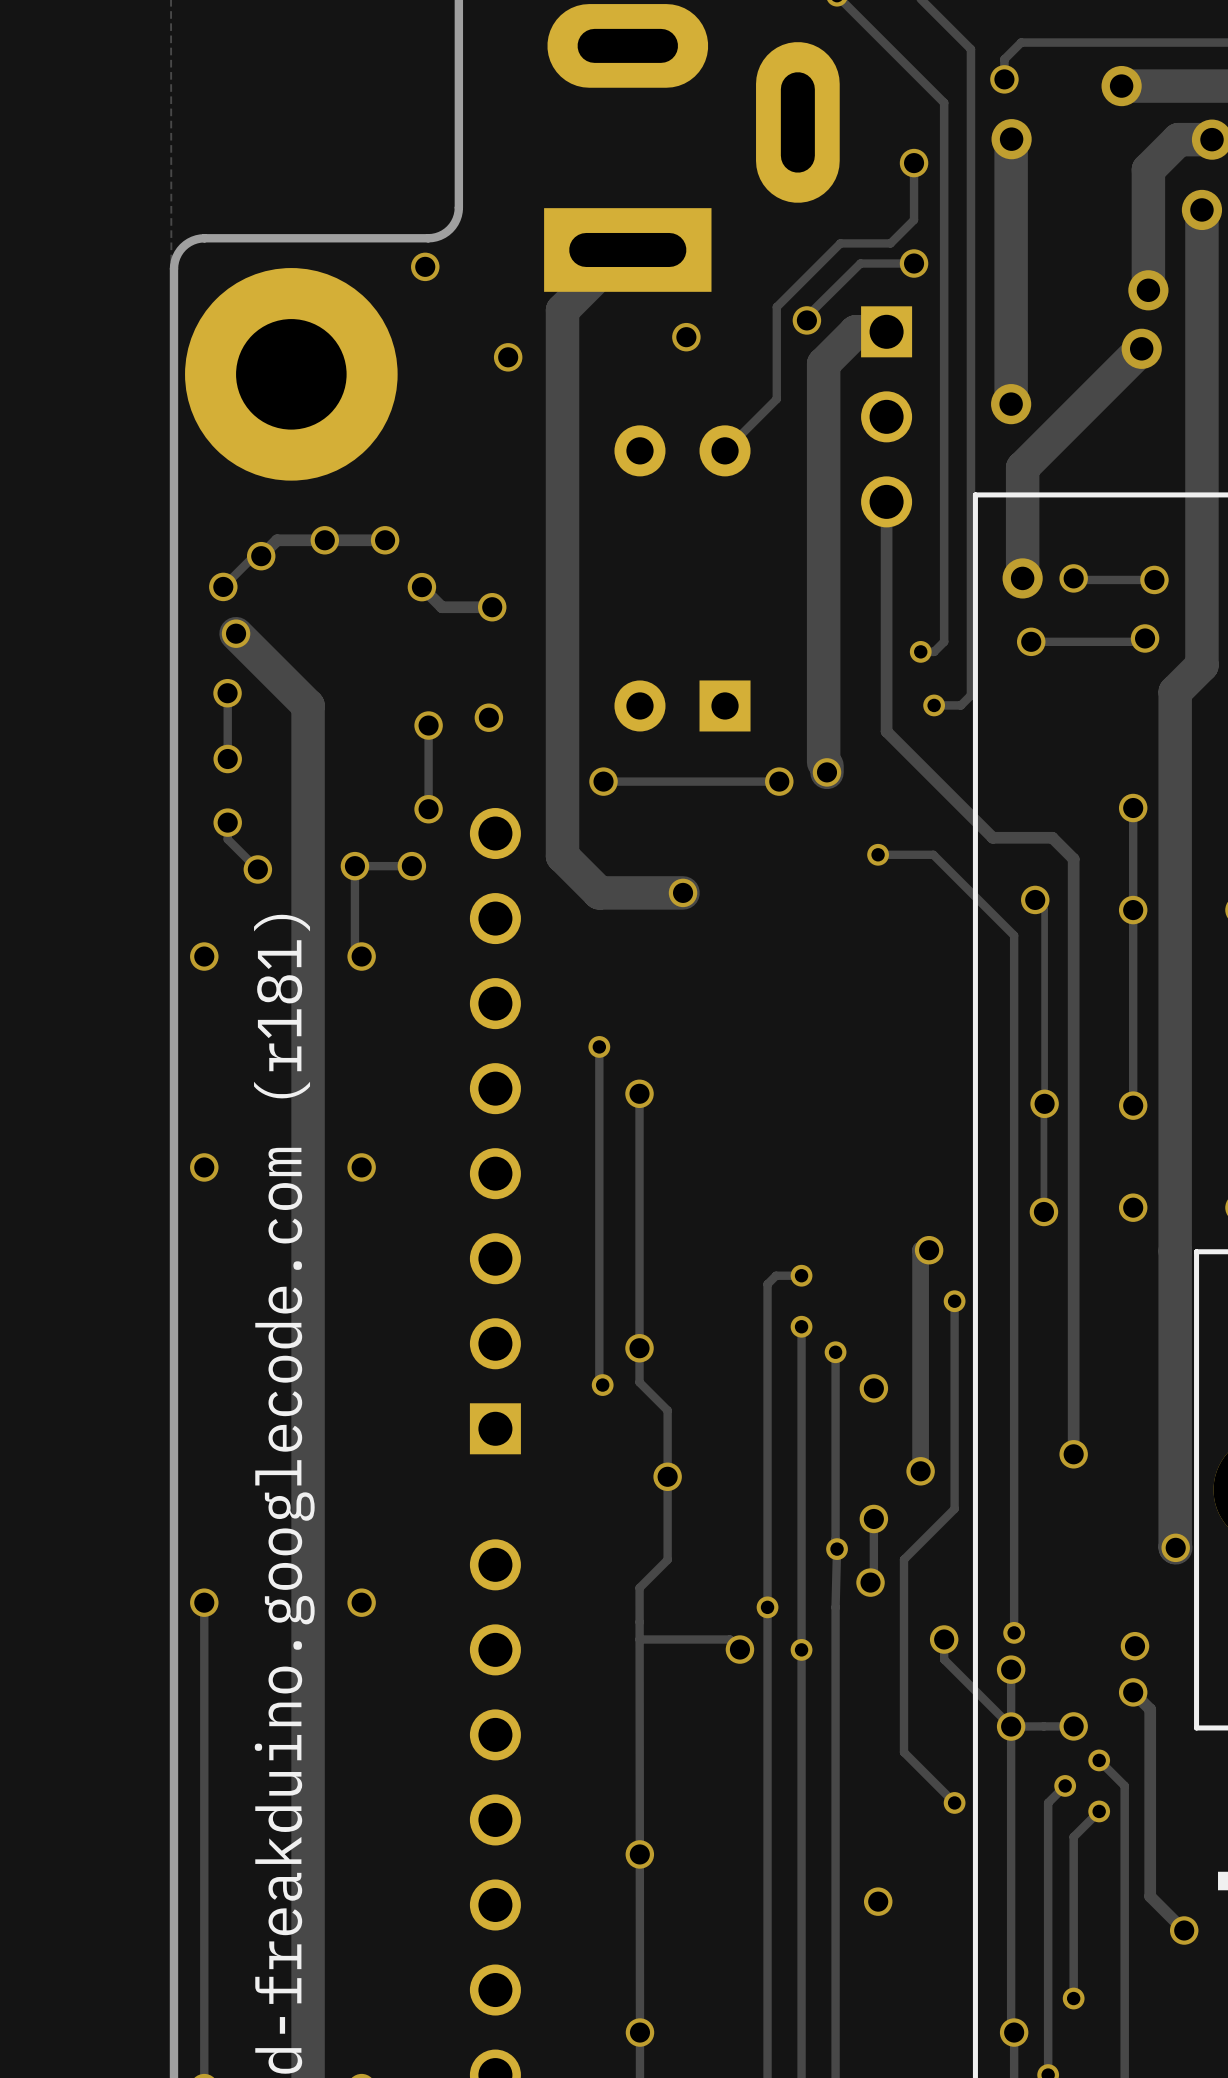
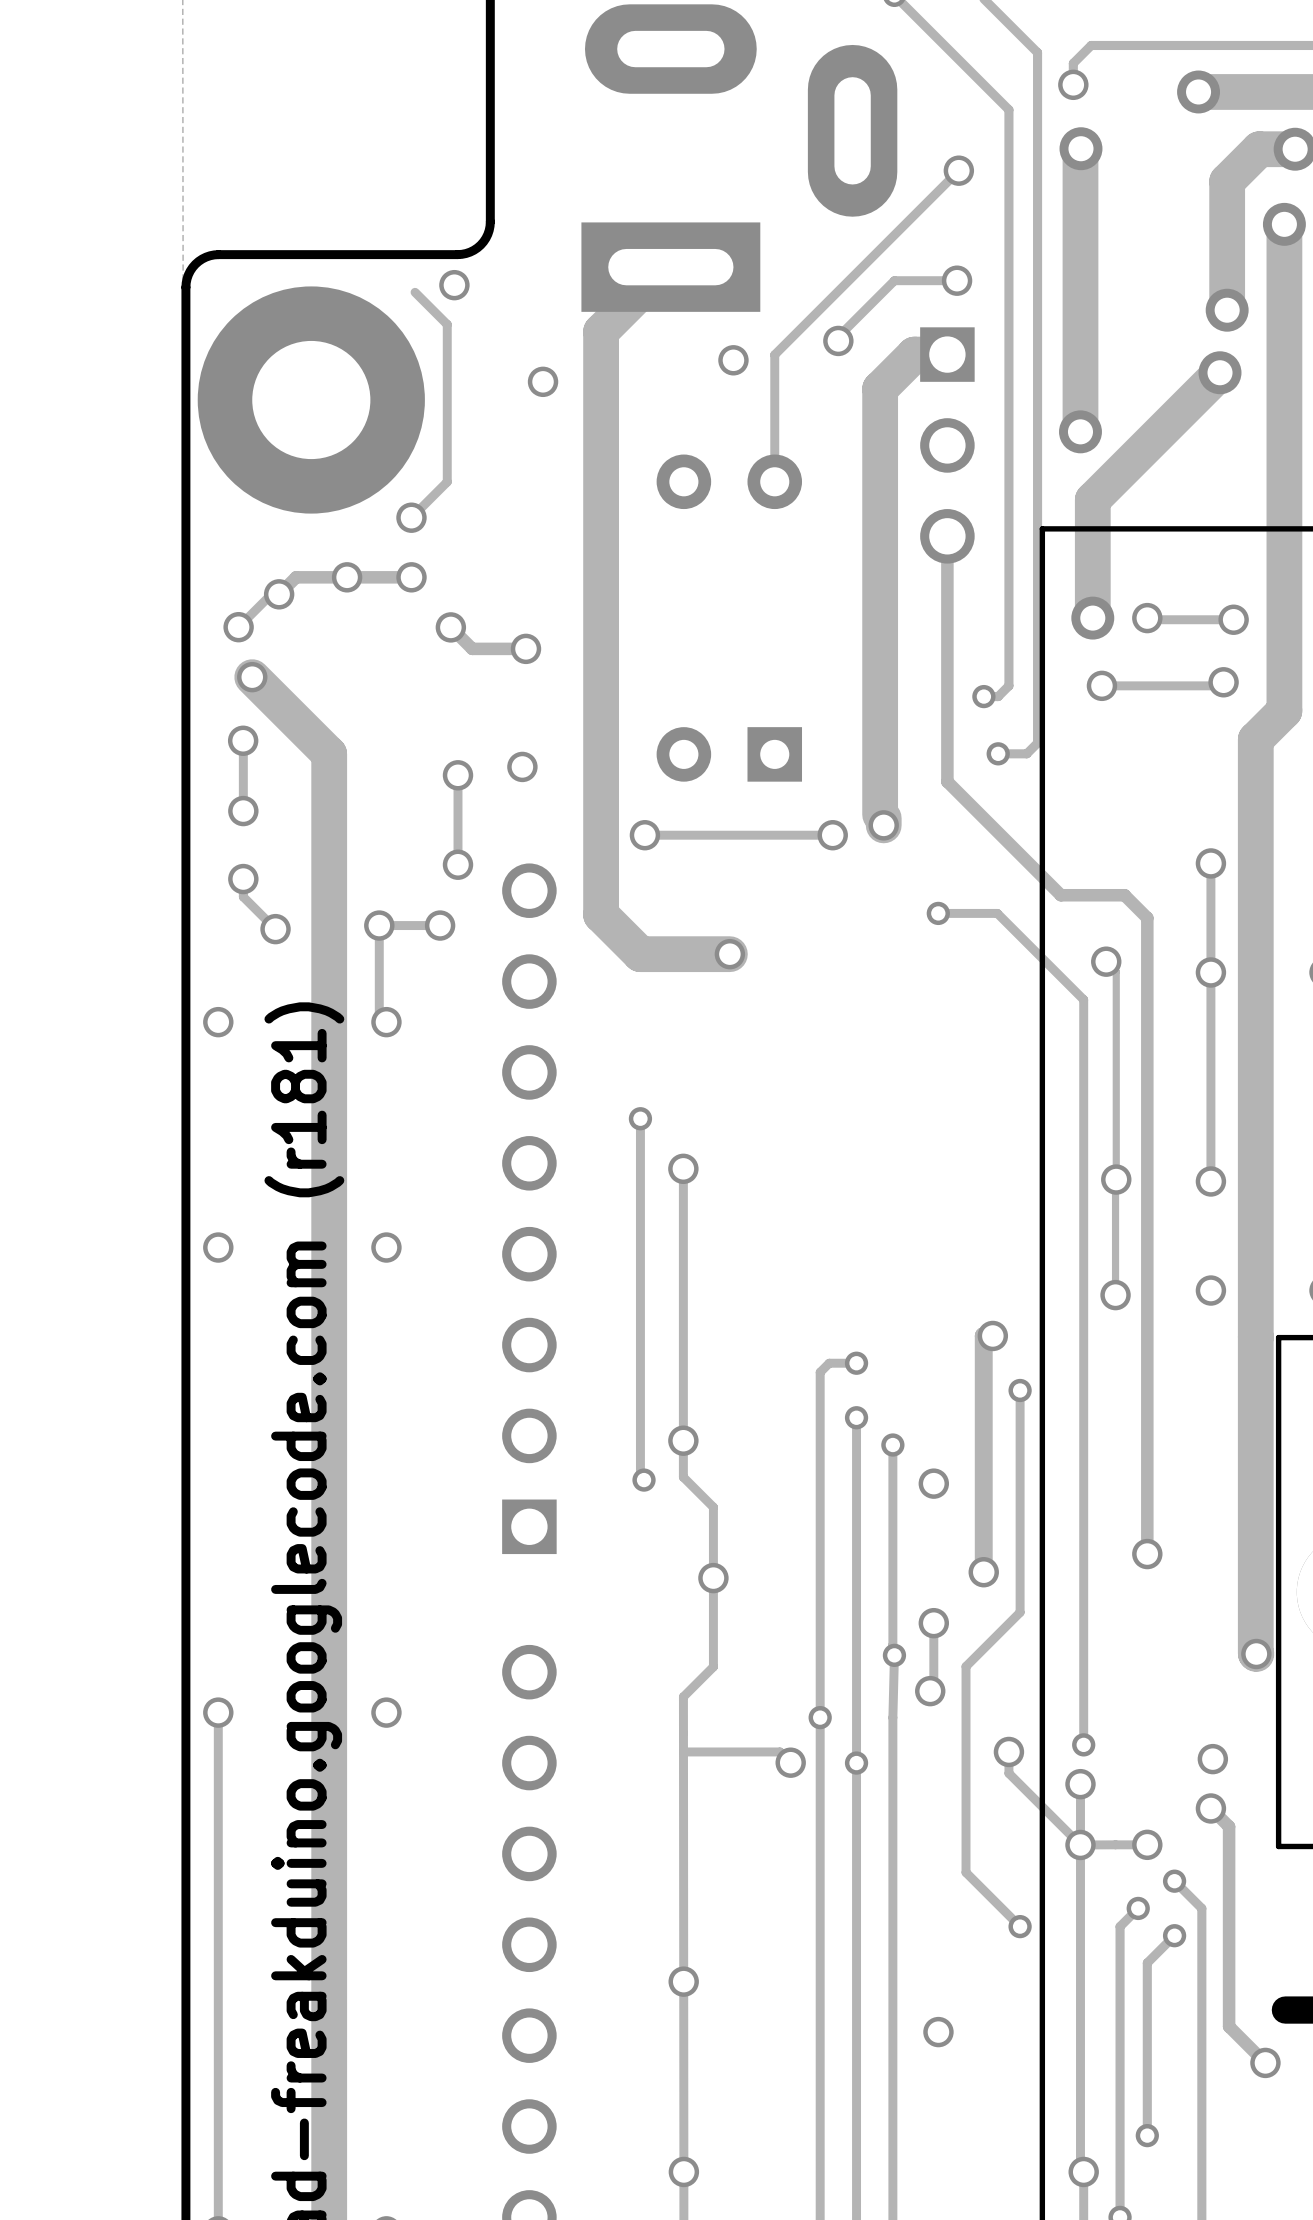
track: (914, 163) (914, 219) (890, 243) (840, 243) (776, 307) (776, 399) (725, 450) -> (958, 170) (774, 354) (774, 481)
via position: (914, 163) -> (958, 170)
track: none -> (957, 280) (894, 280) (838, 336) (838, 340)
track: (914, 263) (860, 263) (806, 316) (806, 320) -> none
via position: (914, 263) -> (957, 280)
track: none -> (415, 292) (447, 324) (447, 481) (411, 517)
via position: (806, 320) -> (838, 340)
via: none -> (411, 517)

